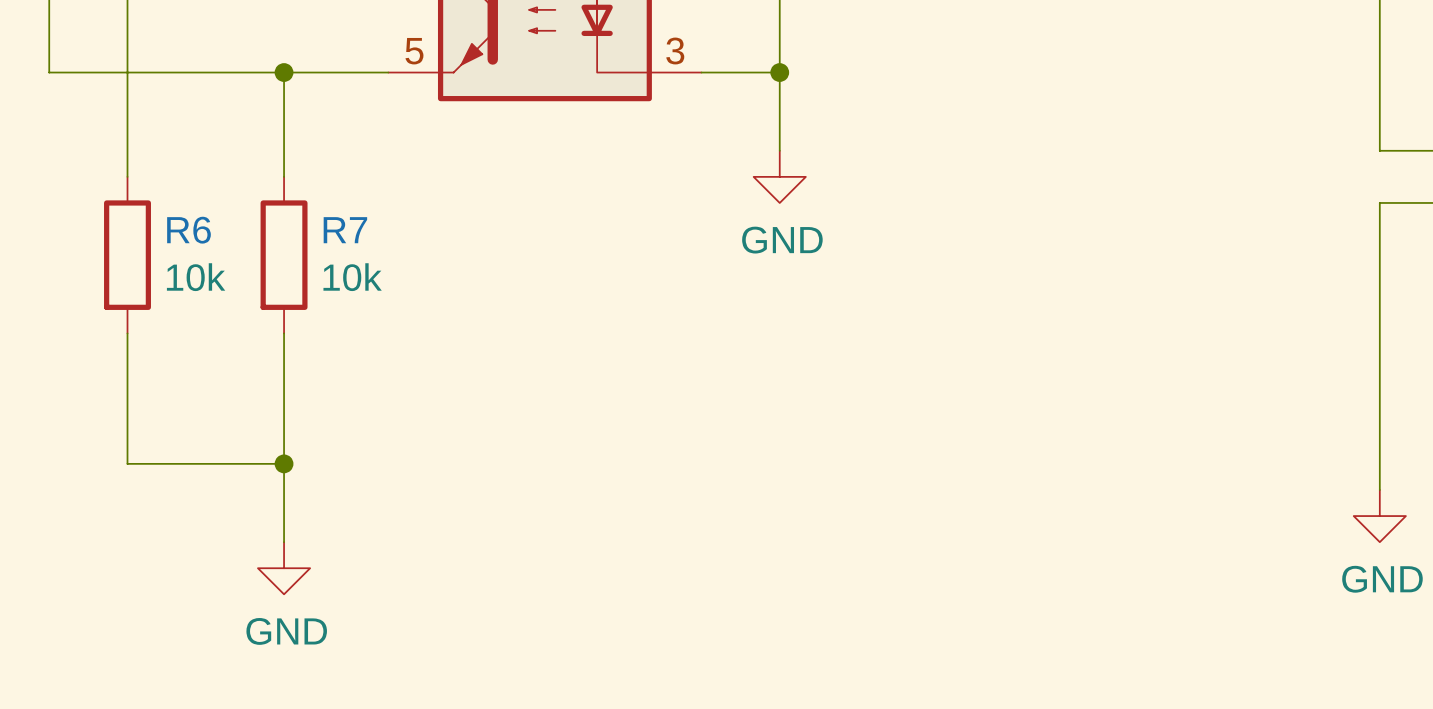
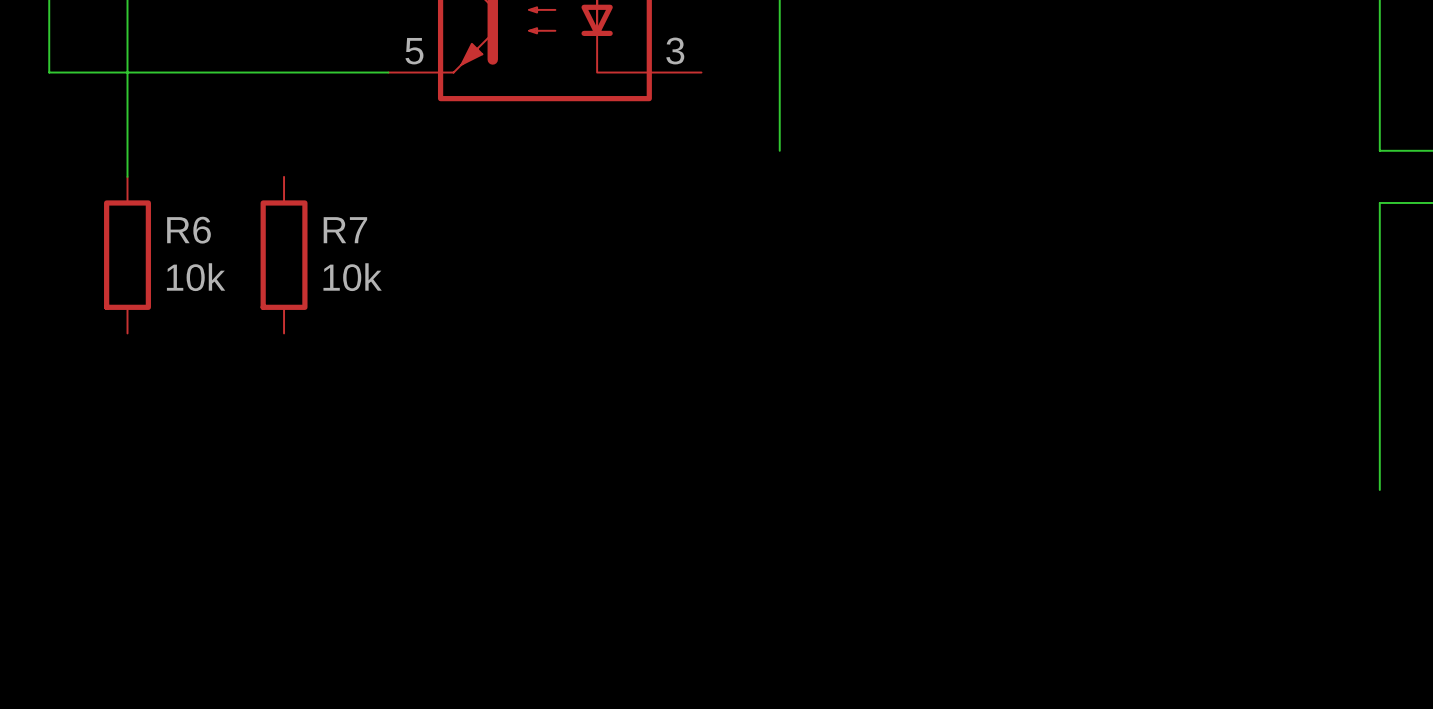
wire: (284, 72) (284, 176) -> none
junction: (284, 72) -> none
wire: (701, 72) (779, 72) -> none
junction: (779, 72) -> none
power symbol: GND (779, 176) -> none
wire: (127, 333) (127, 463) (284, 463) -> none
wire: (284, 333) (284, 542) -> none
junction: (284, 463) -> none
power symbol: GND (1379, 516) -> none
power symbol: GND (284, 568) -> none

